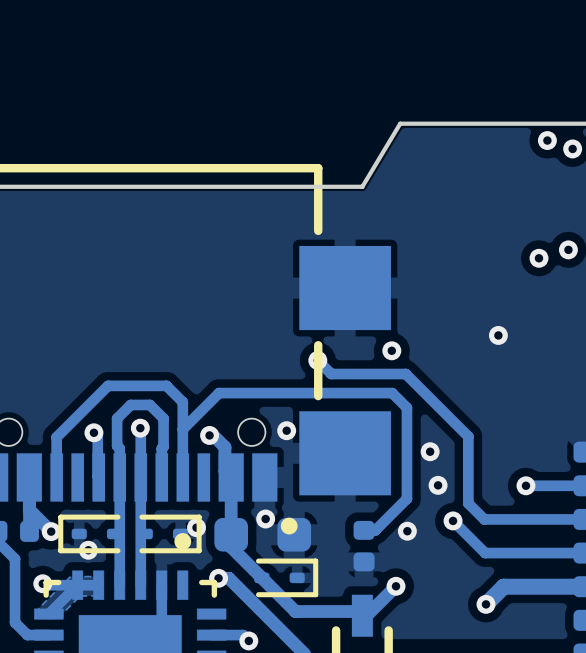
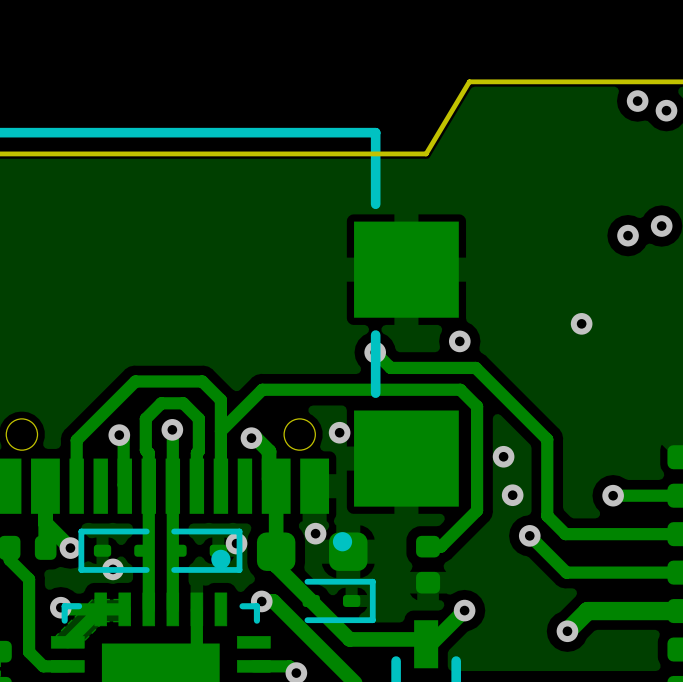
via: (407, 531) -> none

